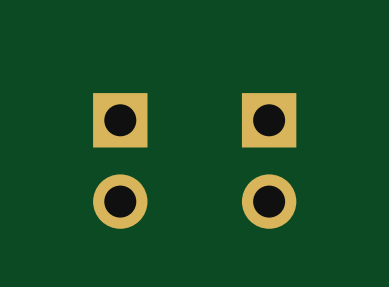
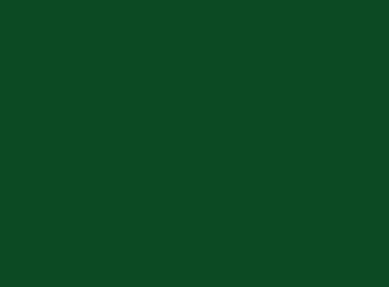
part: (120, 160) -> none
part: (269, 160) -> none

